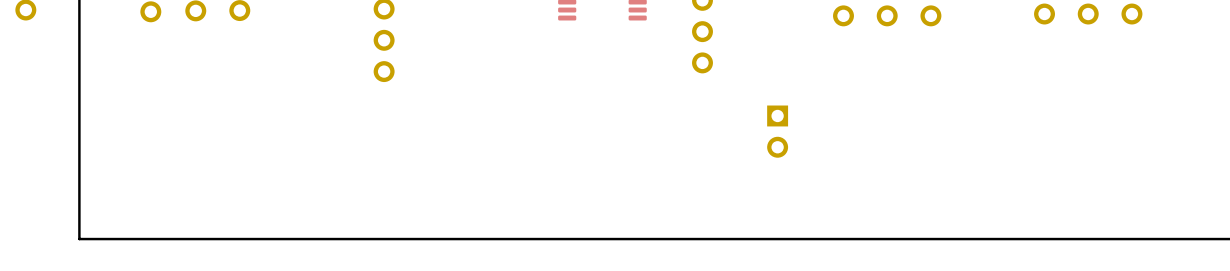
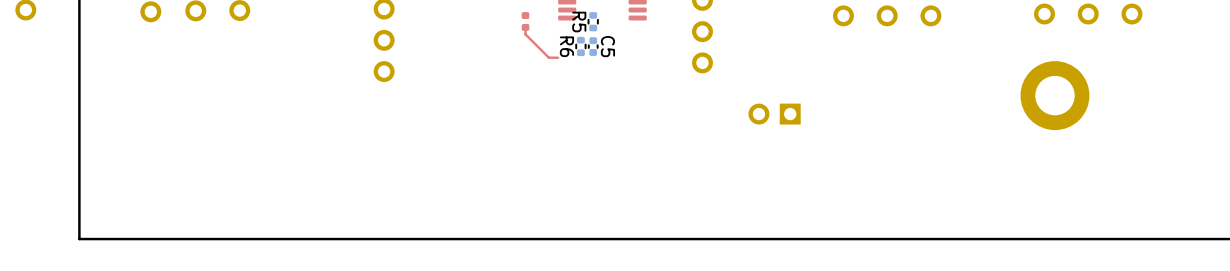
part: none -> (525, 21)
R5: none -> (593, 21)
top track: none -> (525, 27) (525, 34) (548, 57) (557, 57)
R6: none -> (580, 46)
C5: none -> (593, 46)
part: none -> (1054, 95)
part rotation: 0° (777, 131) -> 90° clockwise (774, 114)

